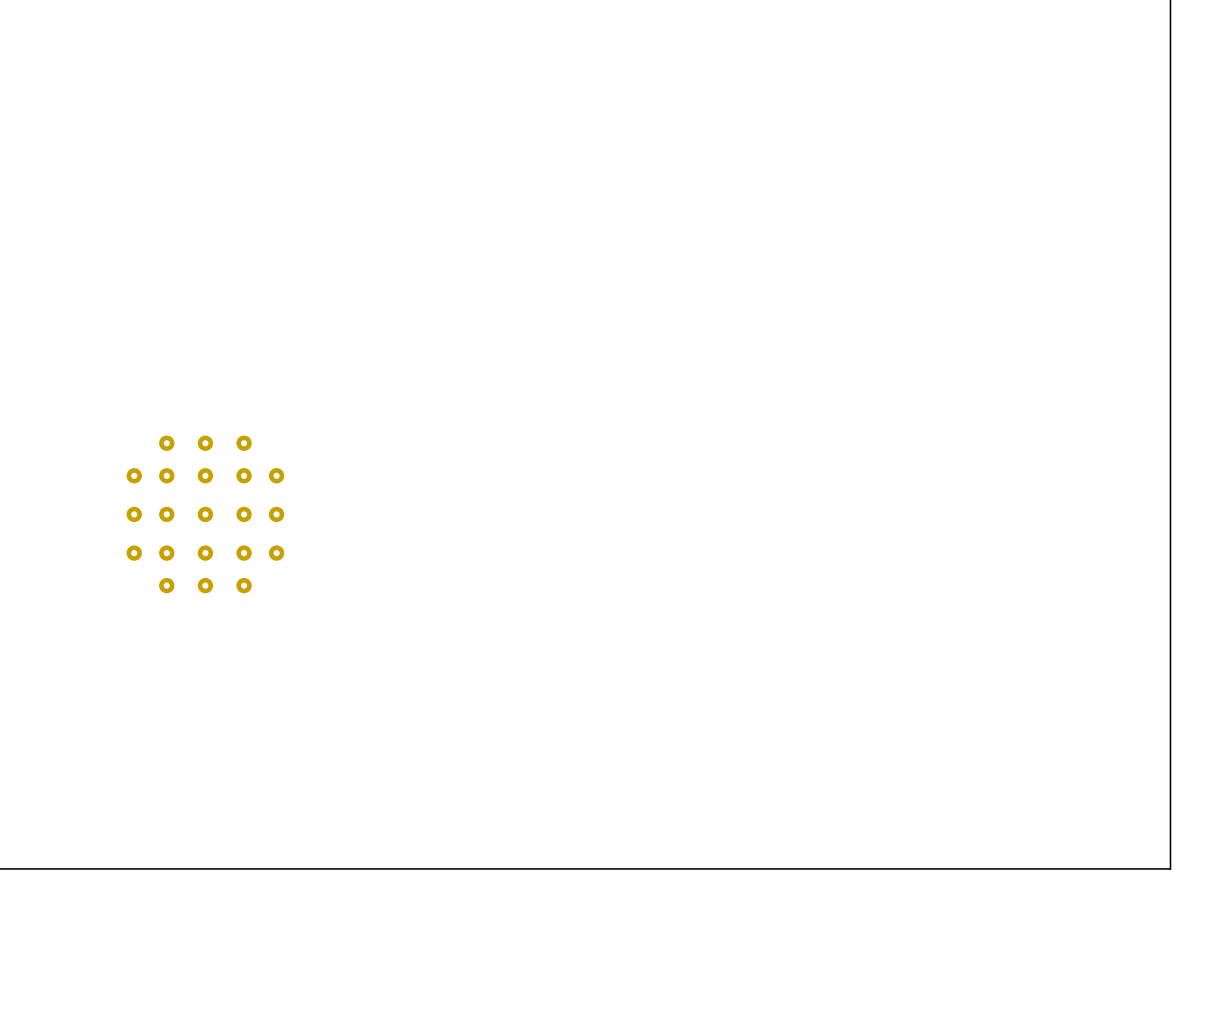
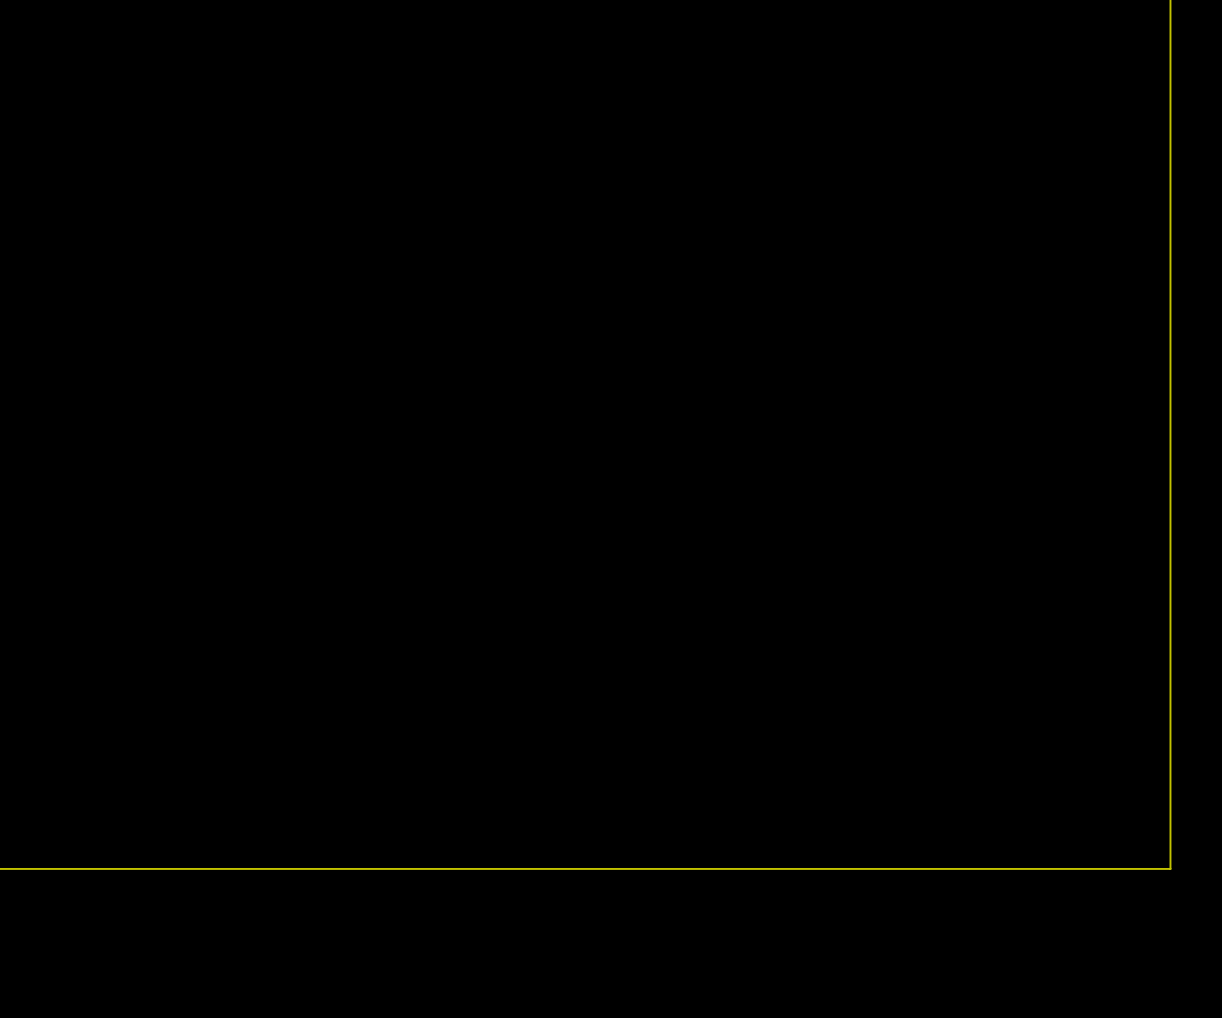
part: (205, 514) -> none

